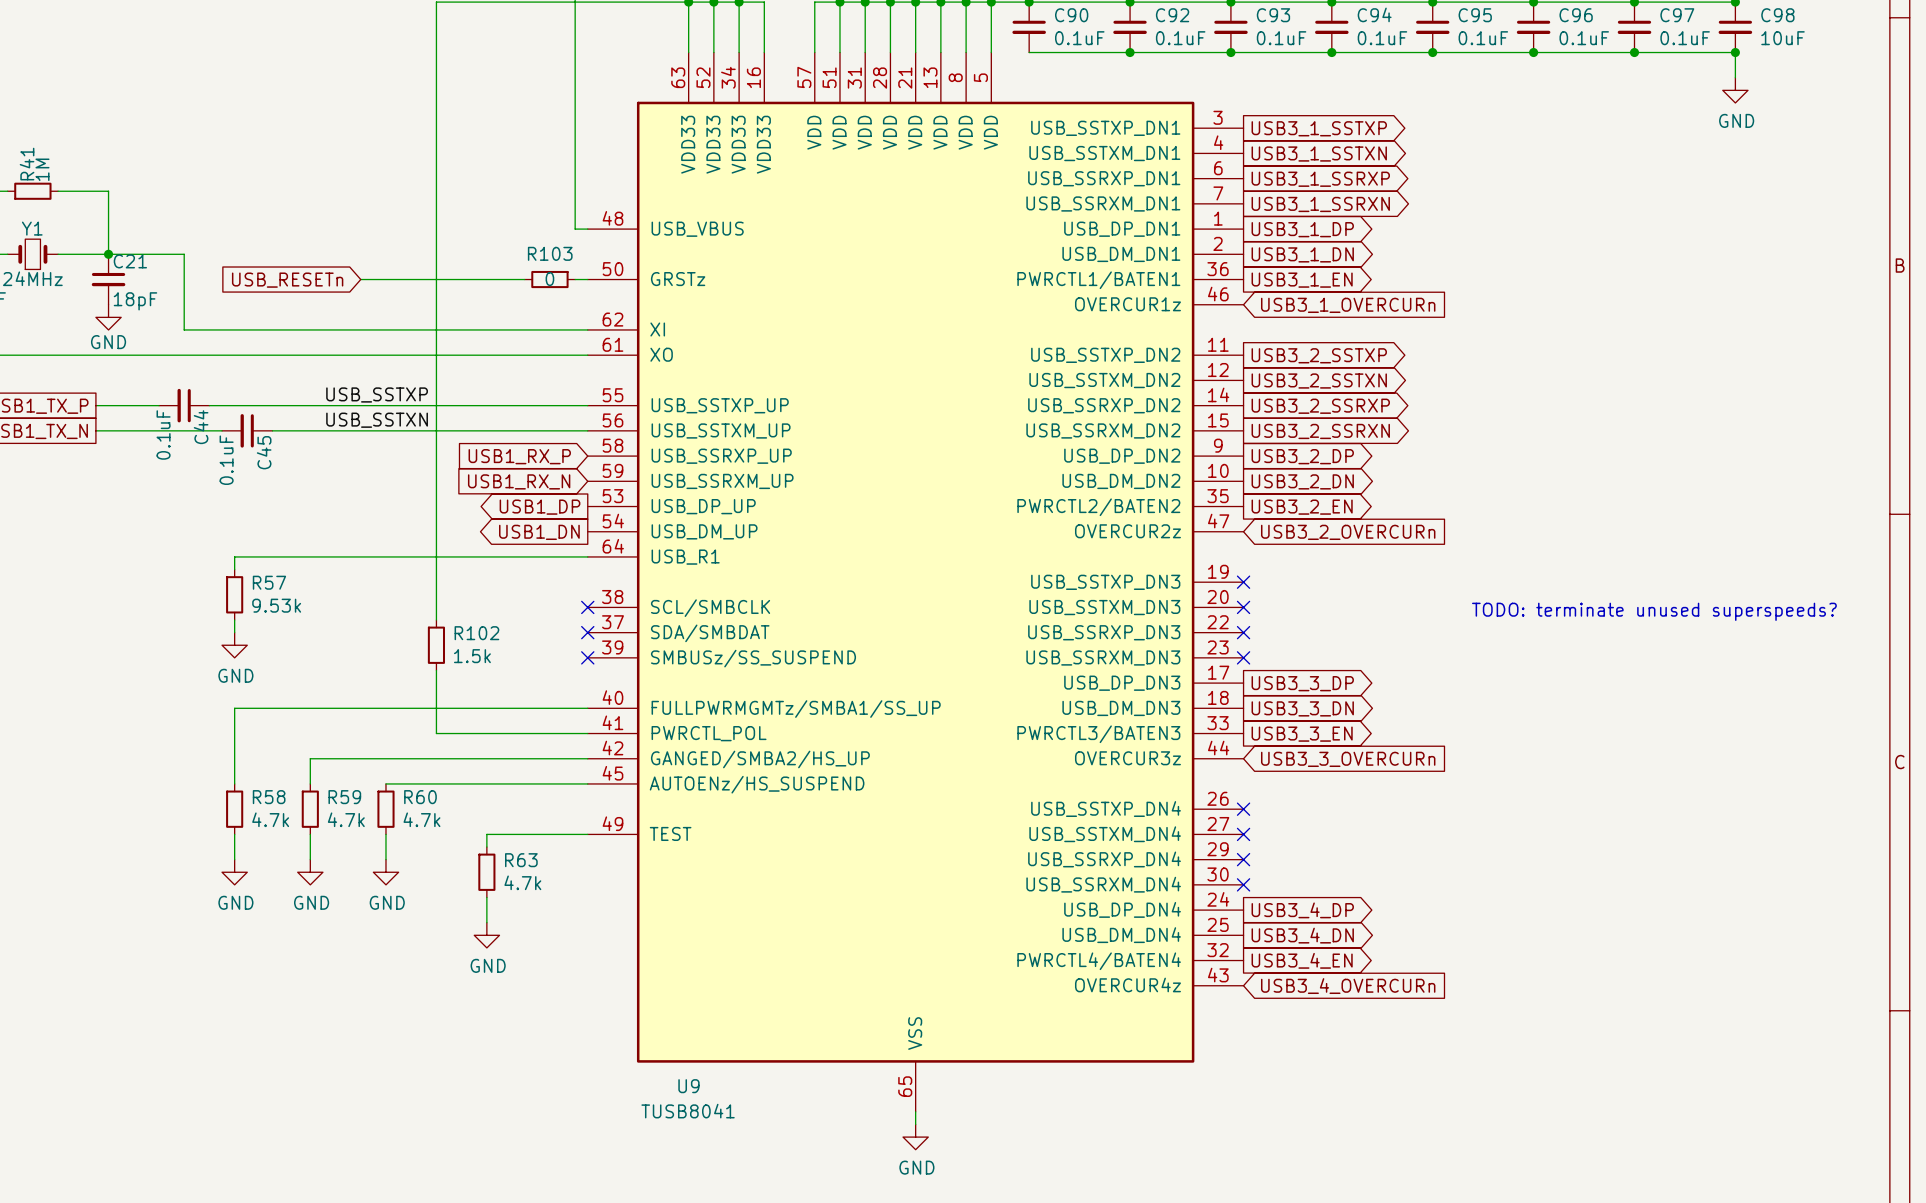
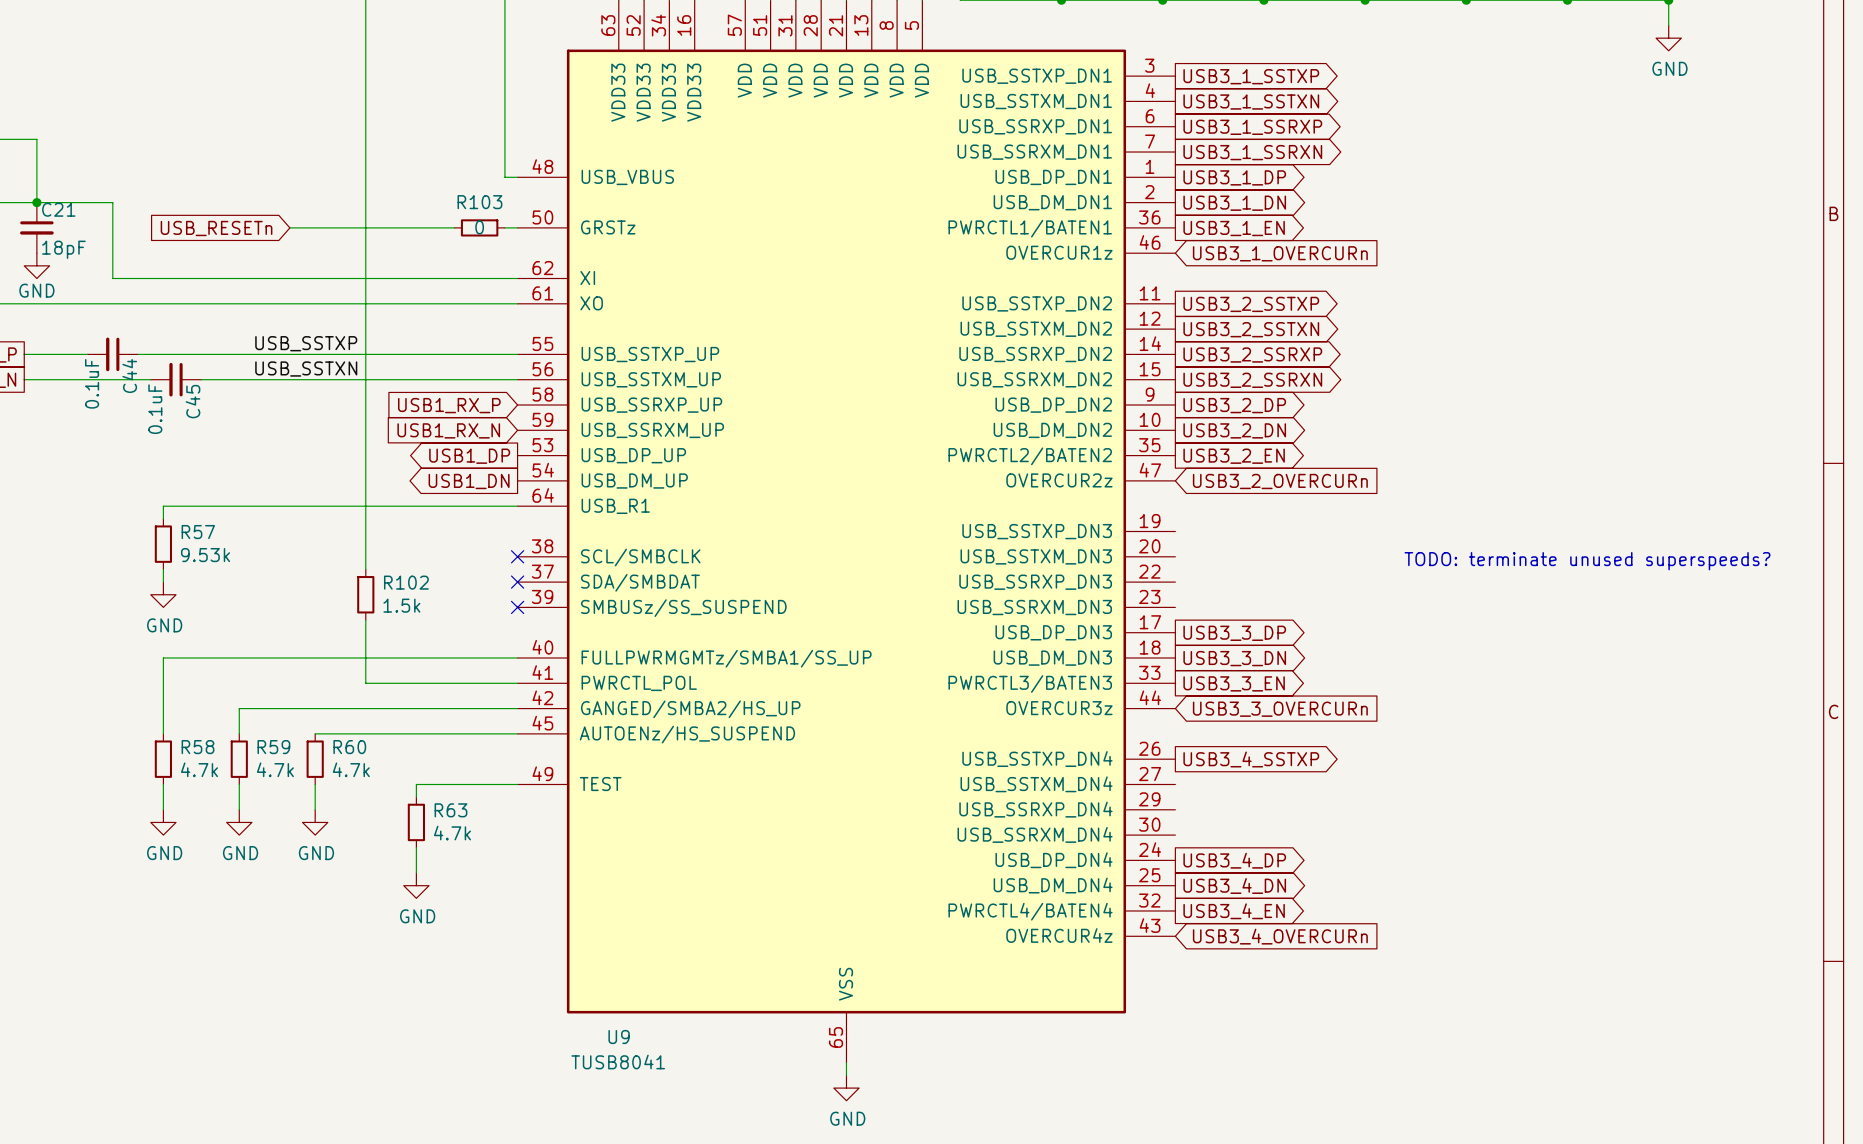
no-connect mark: (1243, 582) -> none
no-connect mark: (1243, 607) -> none
no-connect mark: (1243, 632) -> none
no-connect mark: (1243, 657) -> none
no-connect mark: (1243, 809) -> none
global label: none -> USB3_4_SSTXP (1251, 759)
no-connect mark: (1243, 834) -> none
no-connect mark: (1243, 859) -> none
no-connect mark: (1243, 884) -> none

